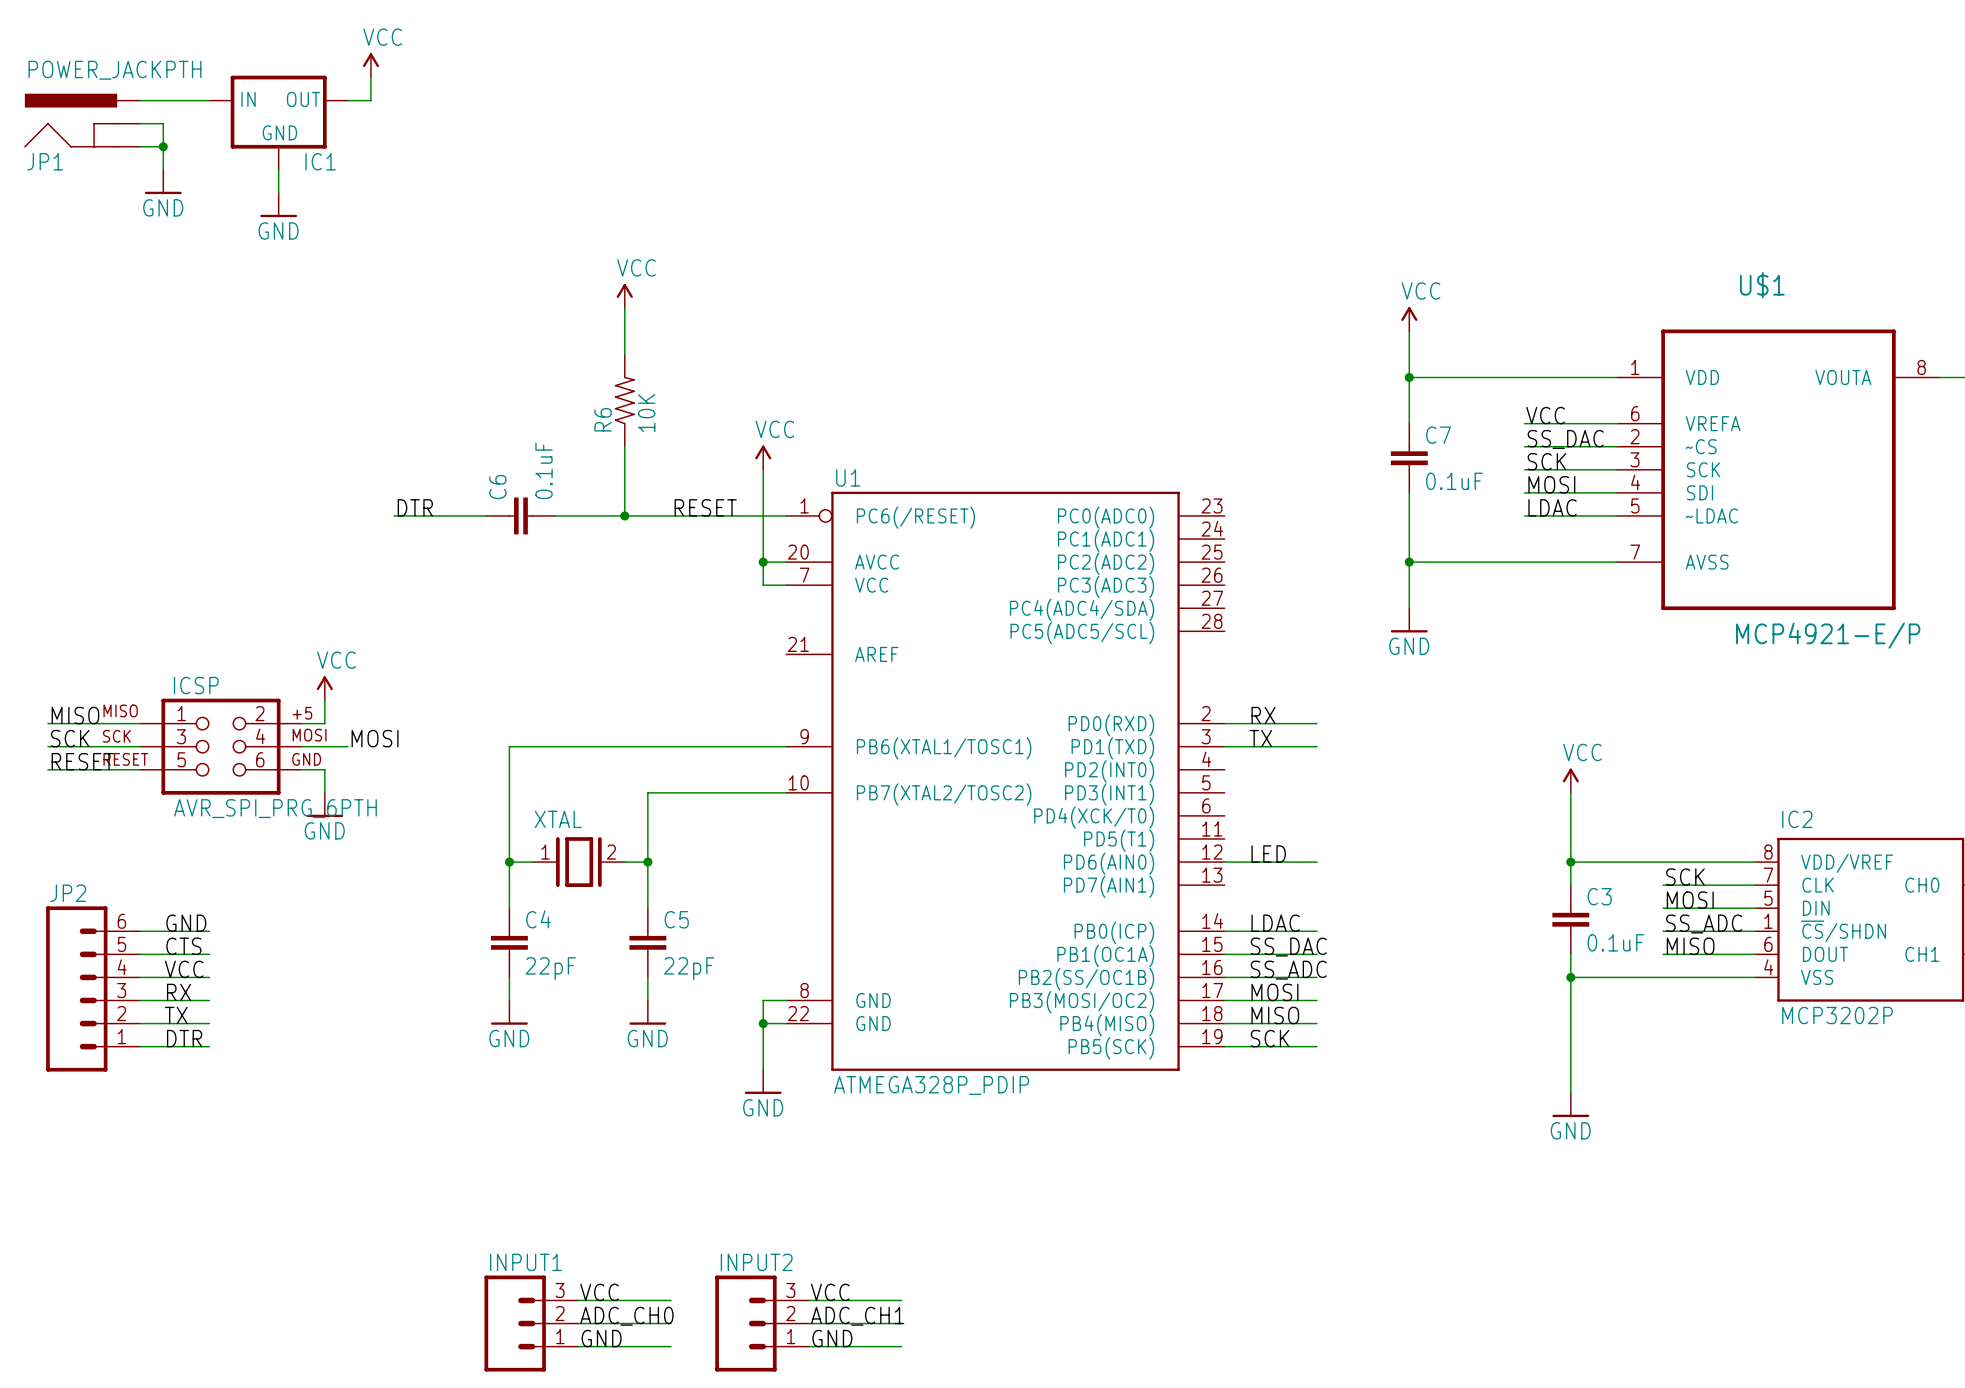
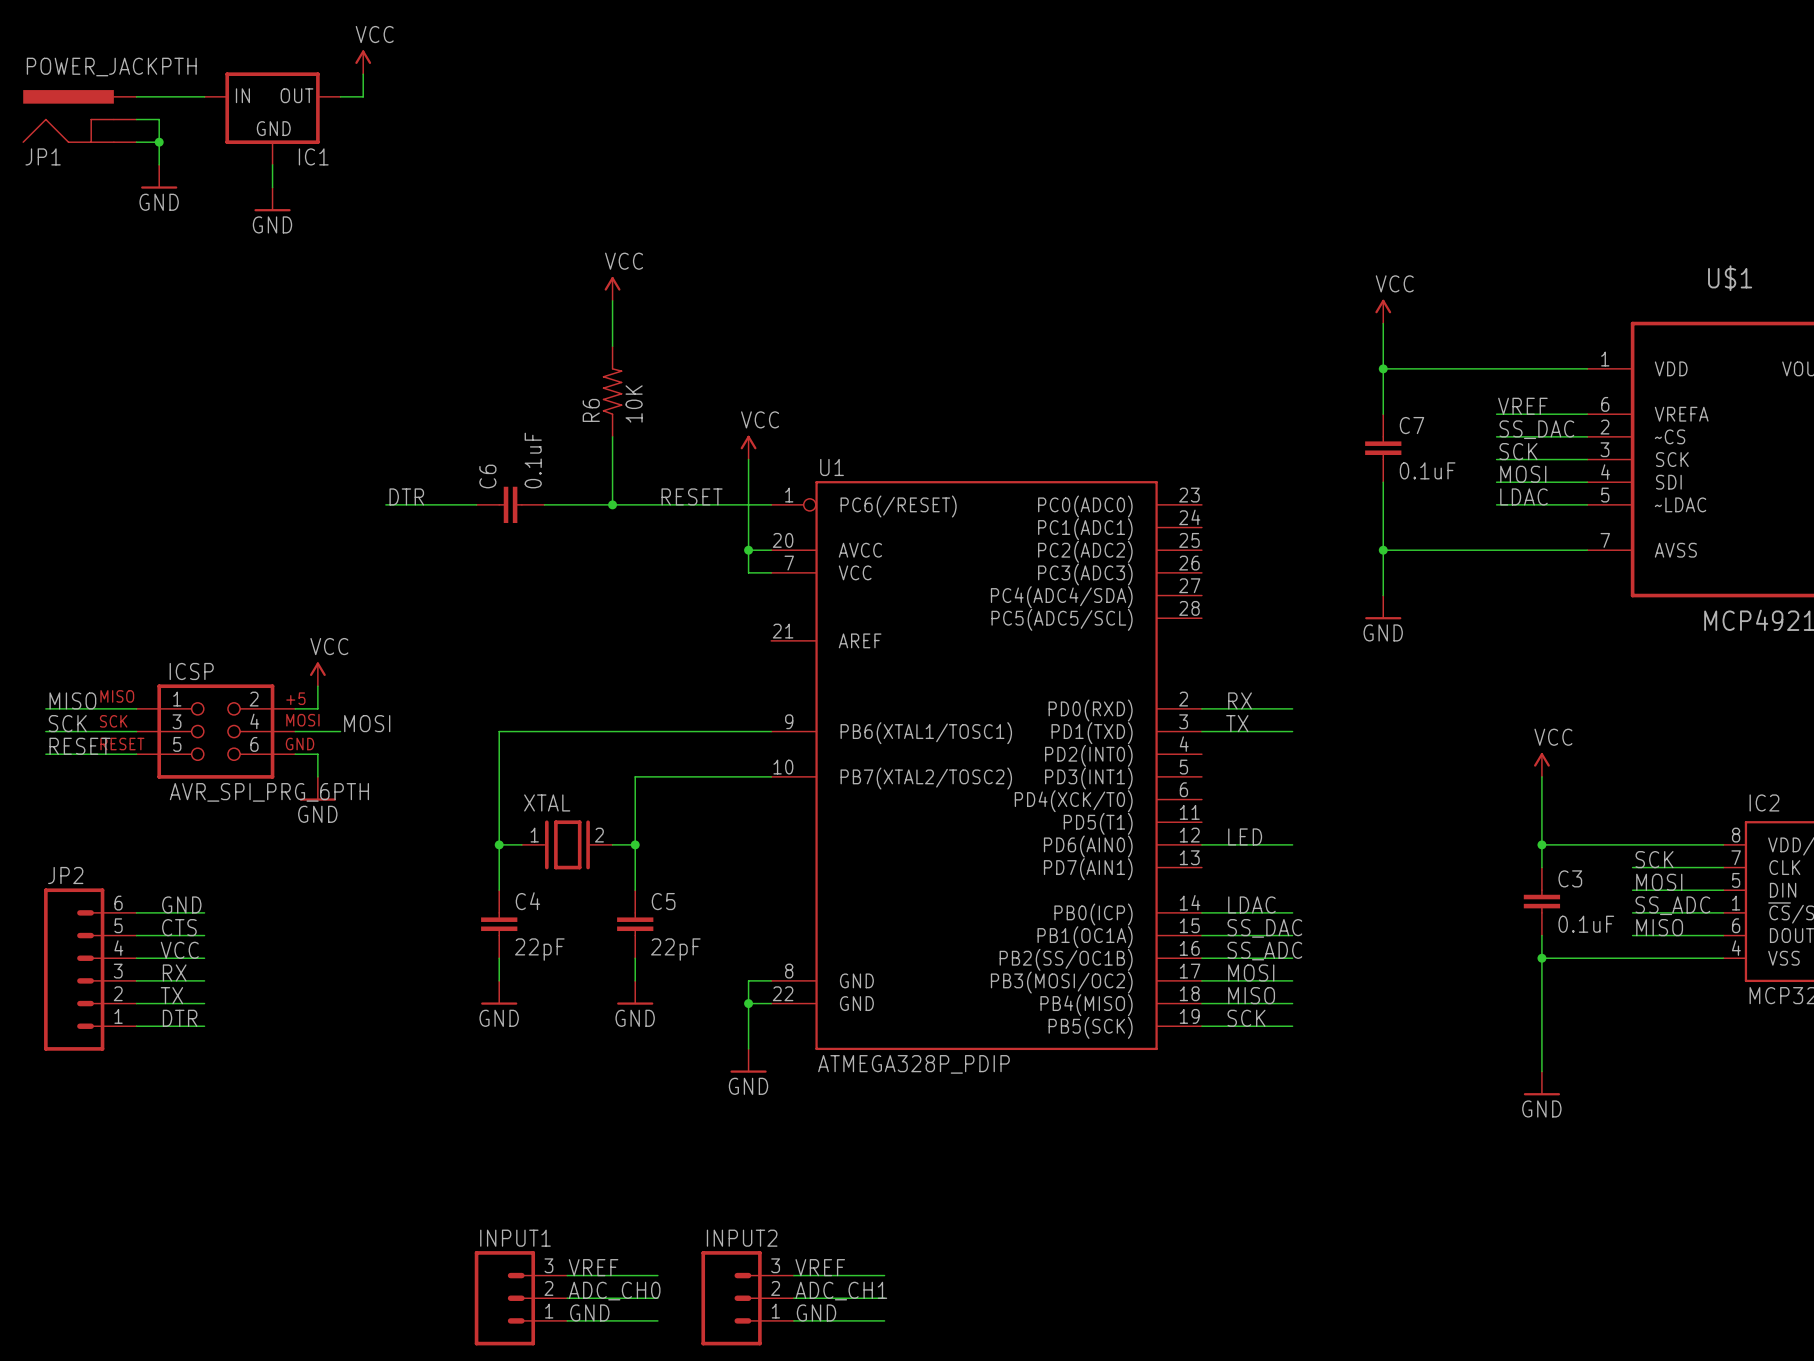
label: VCC (1545, 415) -> VREF (1522, 406)
label: VCC (599, 1292) -> VREF (593, 1267)
label: VCC (830, 1292) -> VREF (820, 1267)

